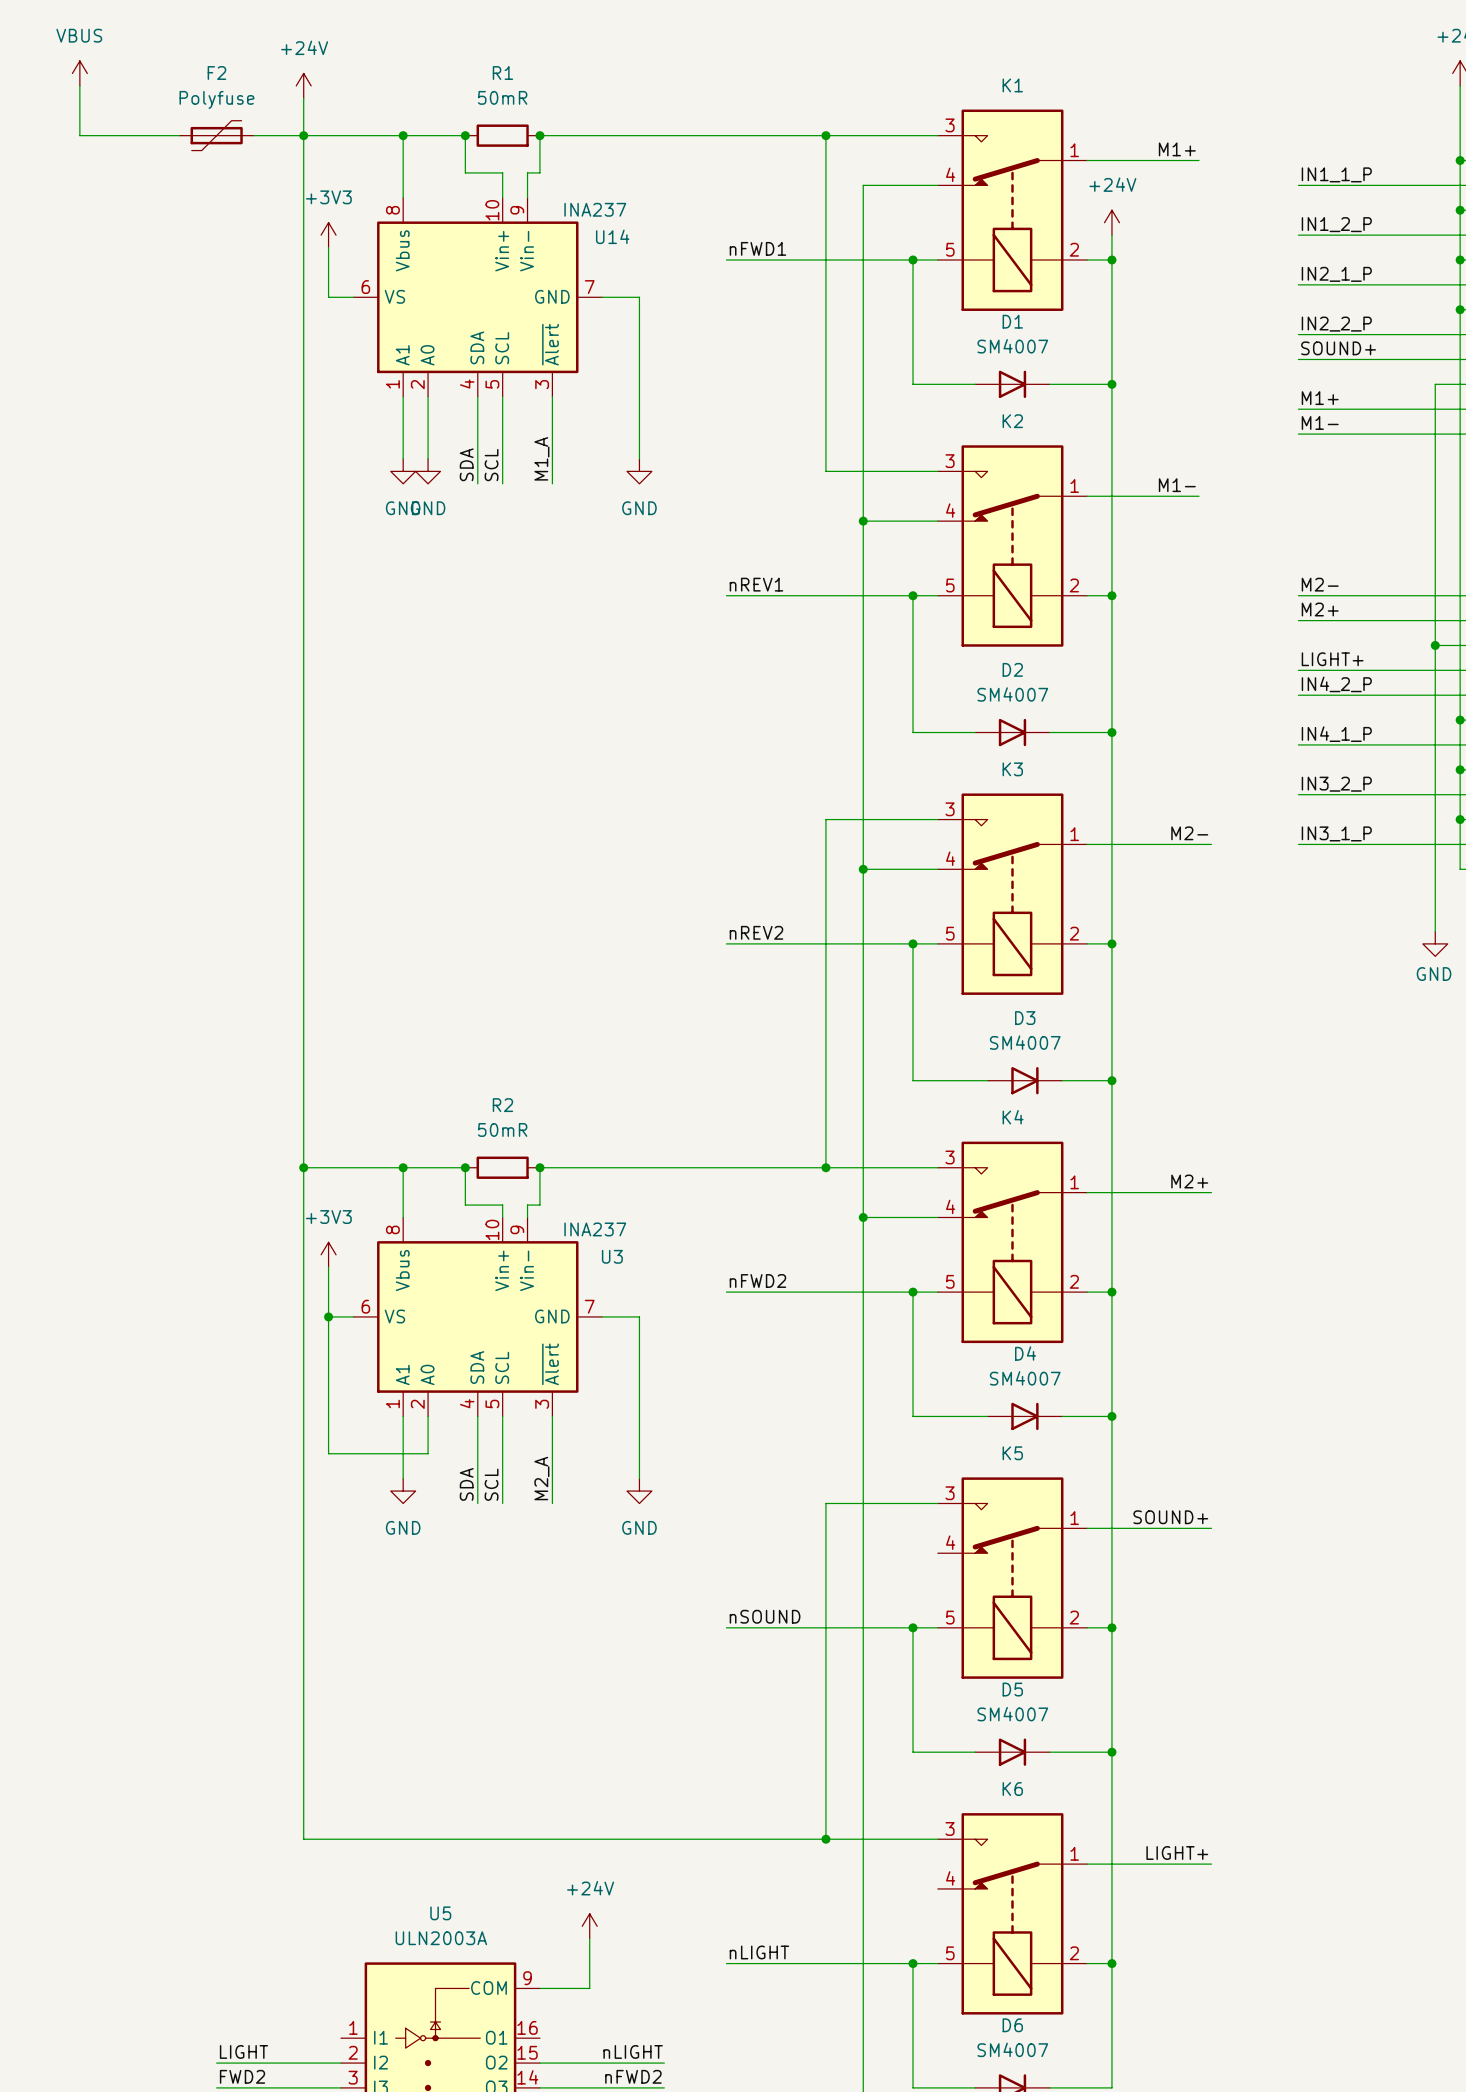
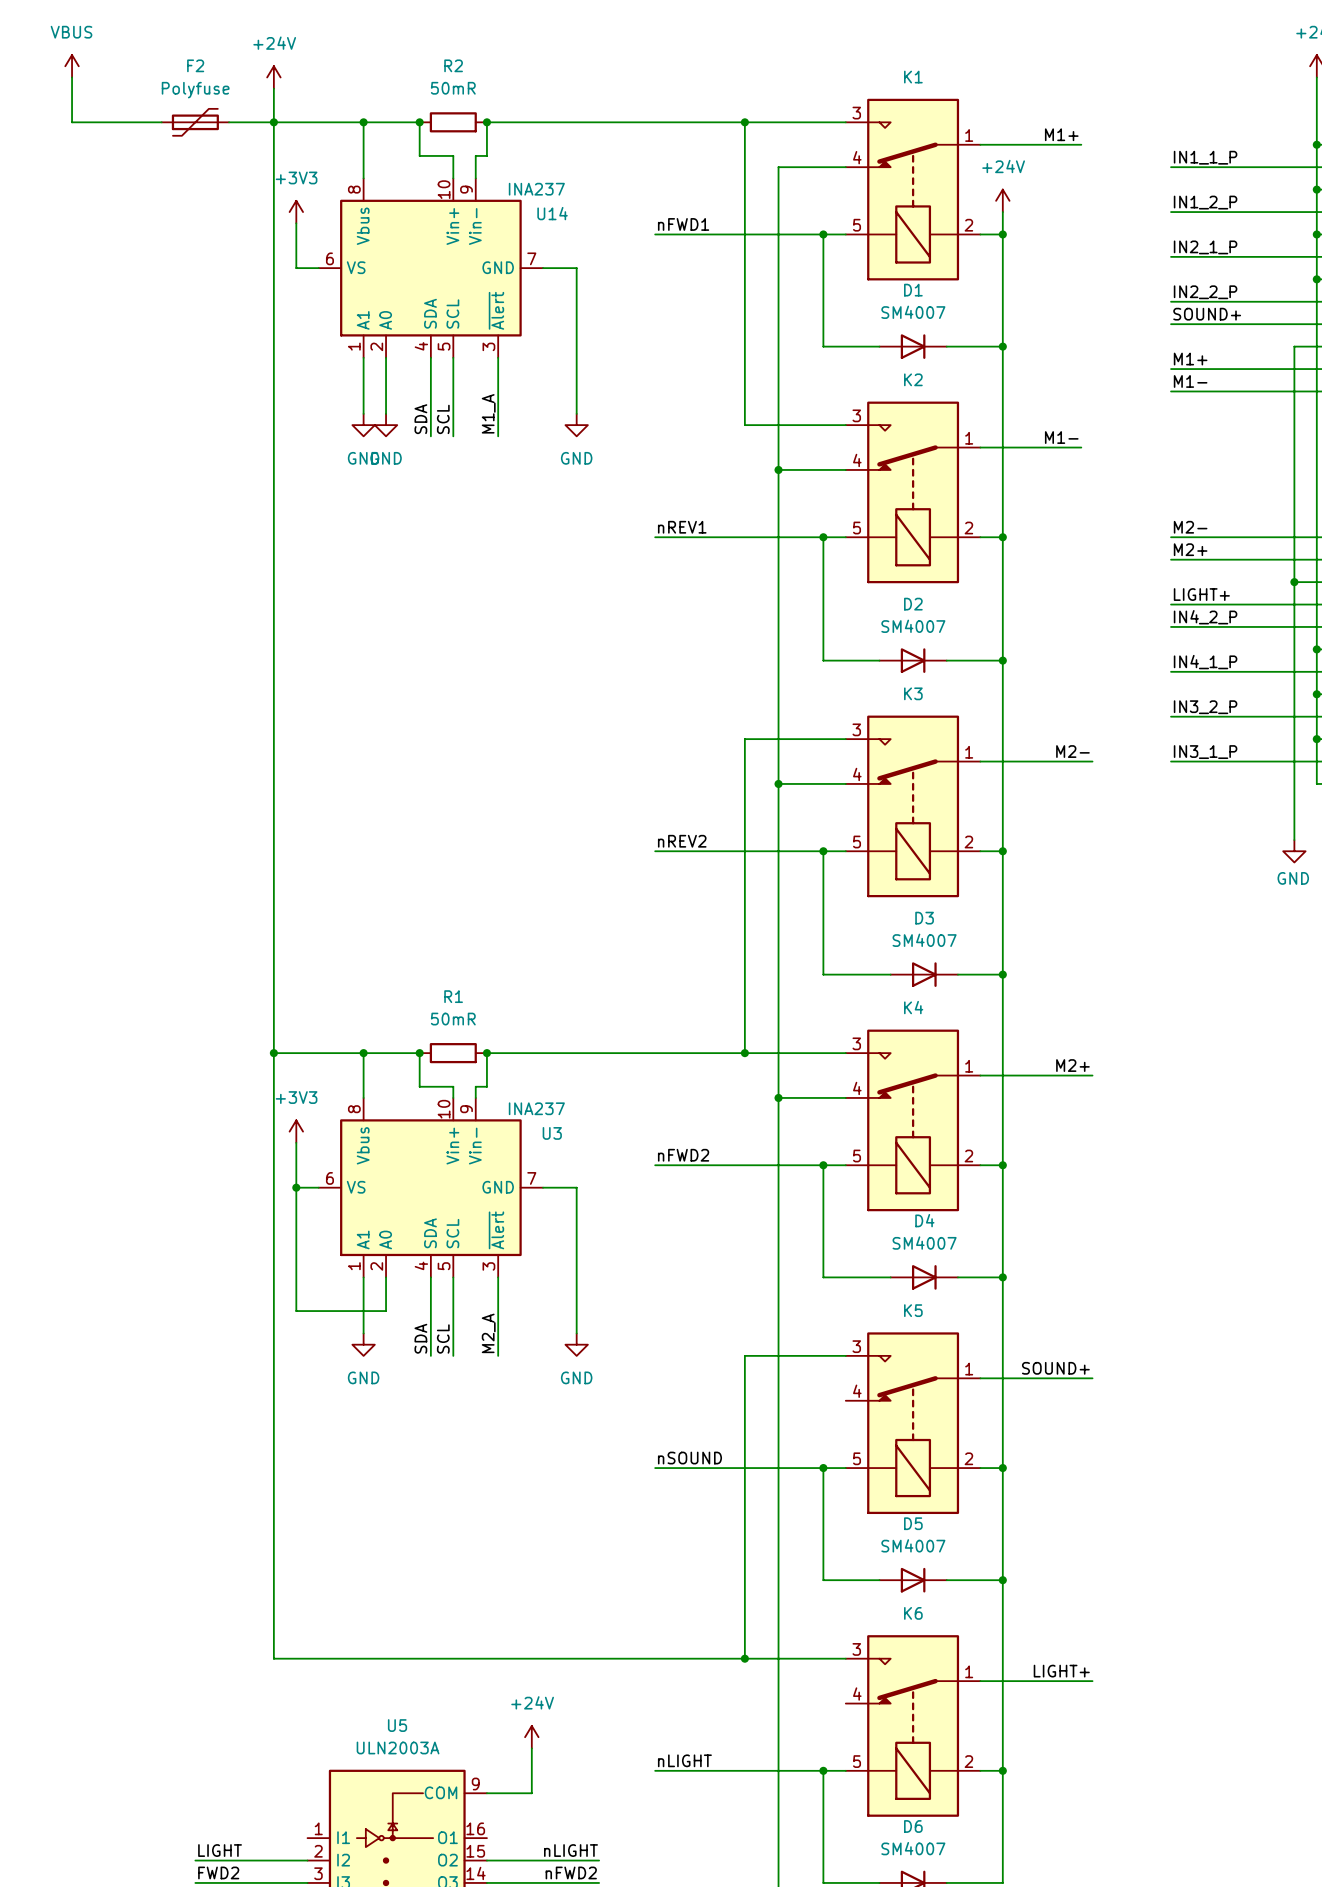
R1 name: R1 (502, 73) -> R2 (453, 65)
R2 name: R2 (502, 1105) -> R1 (453, 996)

